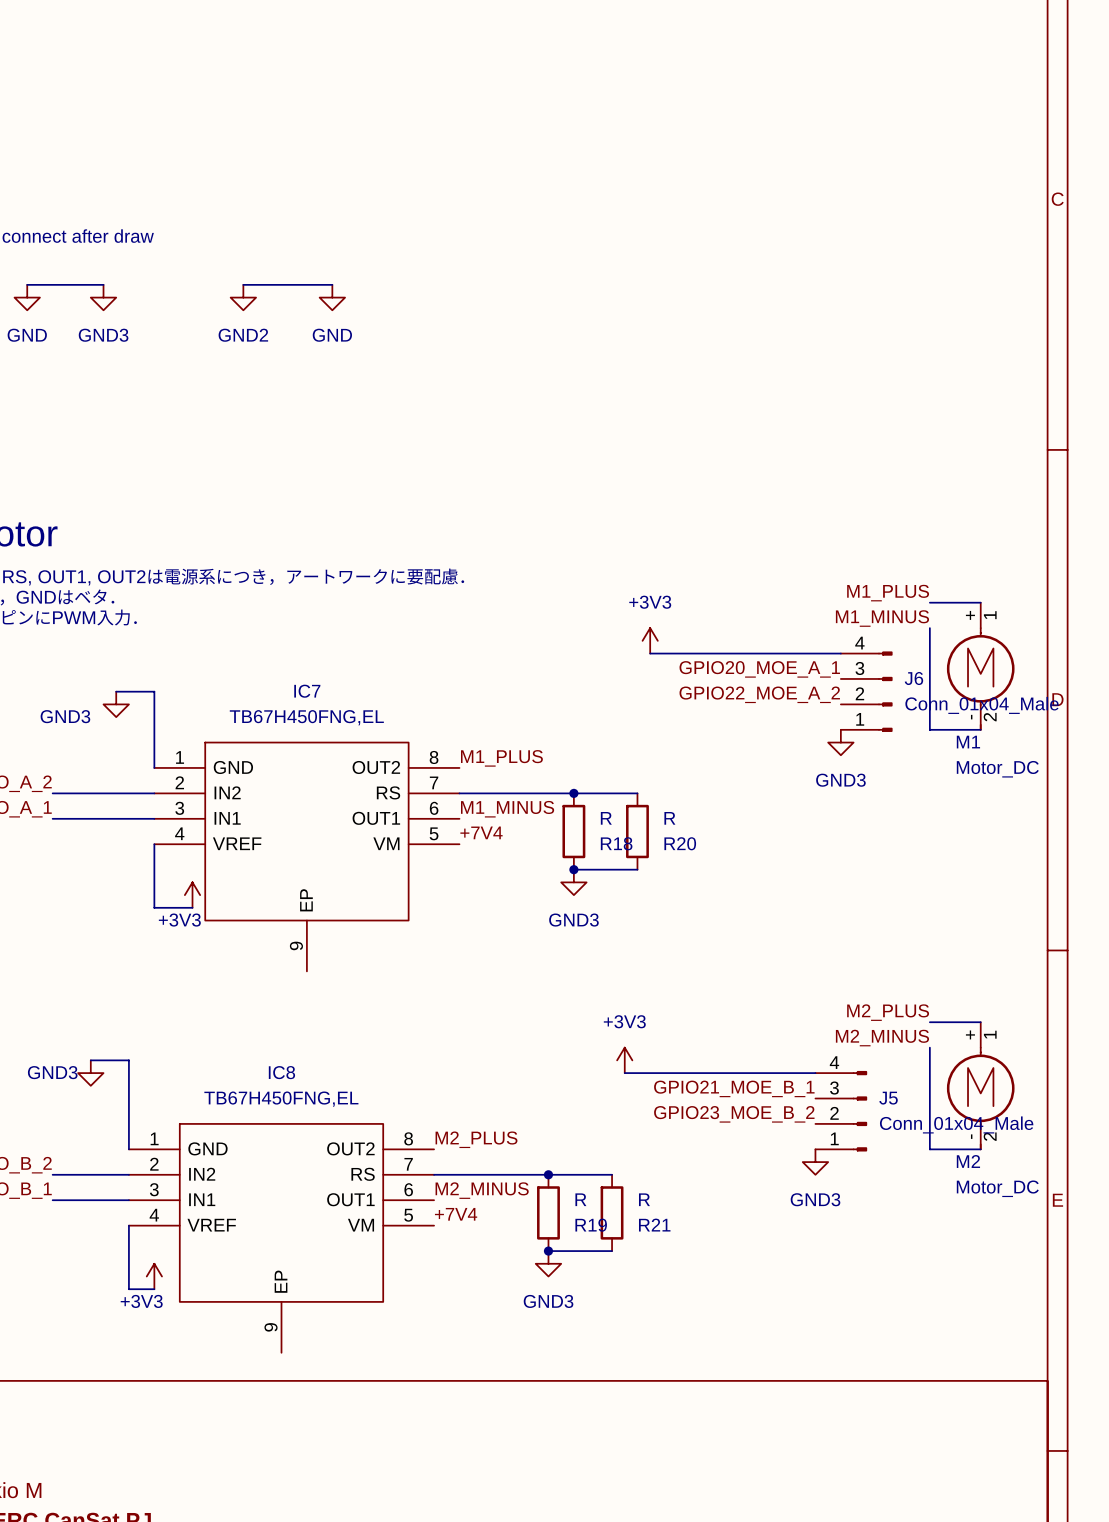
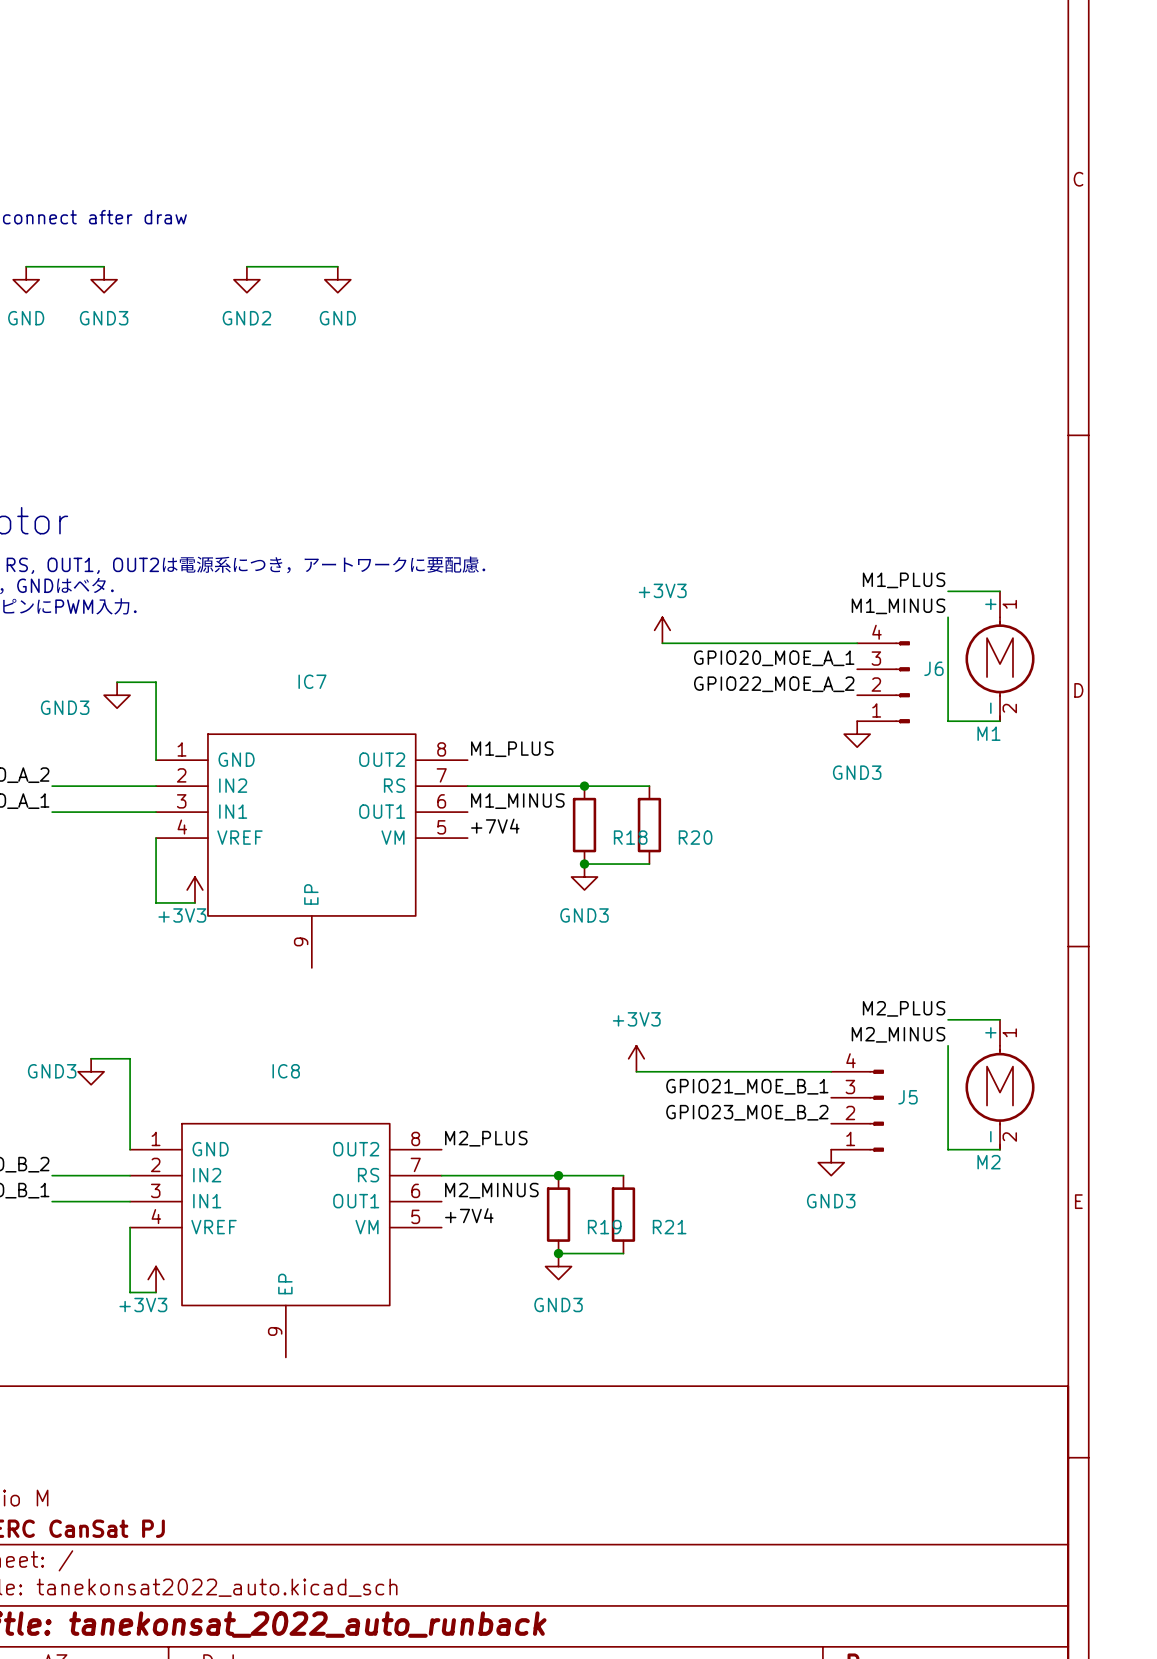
J6 value: Conn_01x04_Male (982, 705) -> none
IC7 value: TB67H450FNG,EL (306, 717) -> none
M1 value: Motor_DC (997, 769) -> none
R18 value: R (606, 818) -> none
R20 value: R (669, 818) -> none
IC8 value: TB67H450FNG,EL (281, 1099) -> none
J5 value: Conn_01x04_Male (956, 1124) -> none
M2 value: Motor_DC (997, 1188) -> none
R19 value: R (580, 1199) -> none
R21 value: R (644, 1199) -> none

